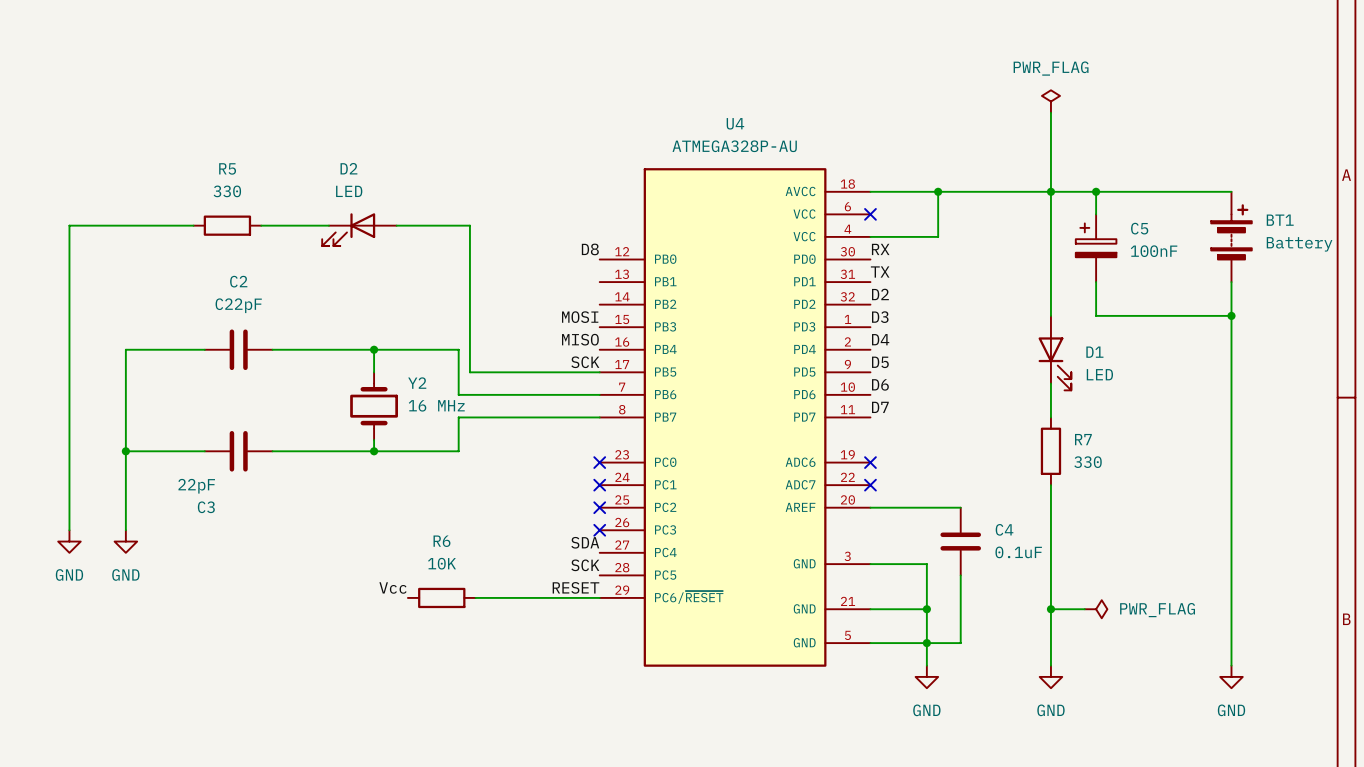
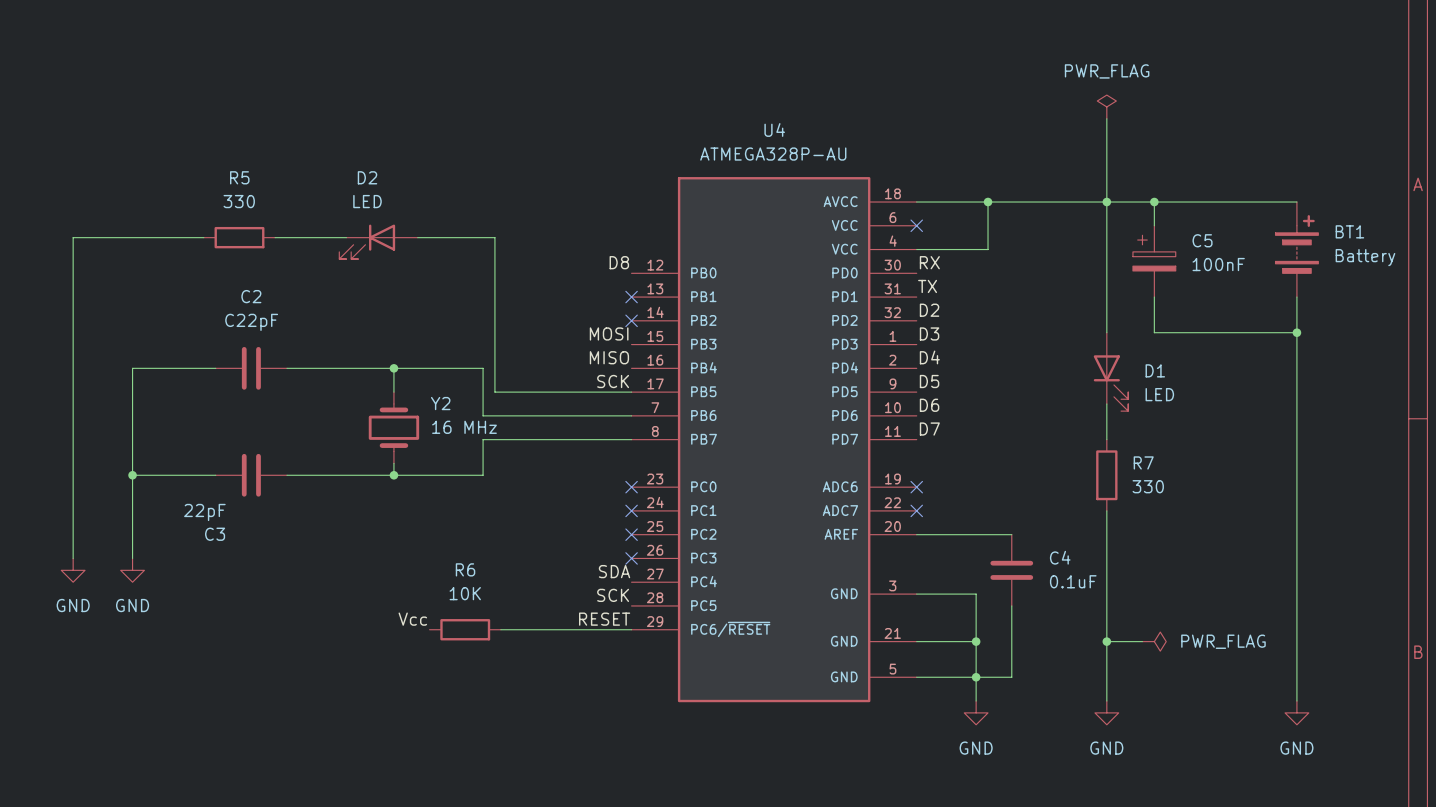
no-connect mark: none -> (631, 297)
no-connect mark: none -> (631, 320)

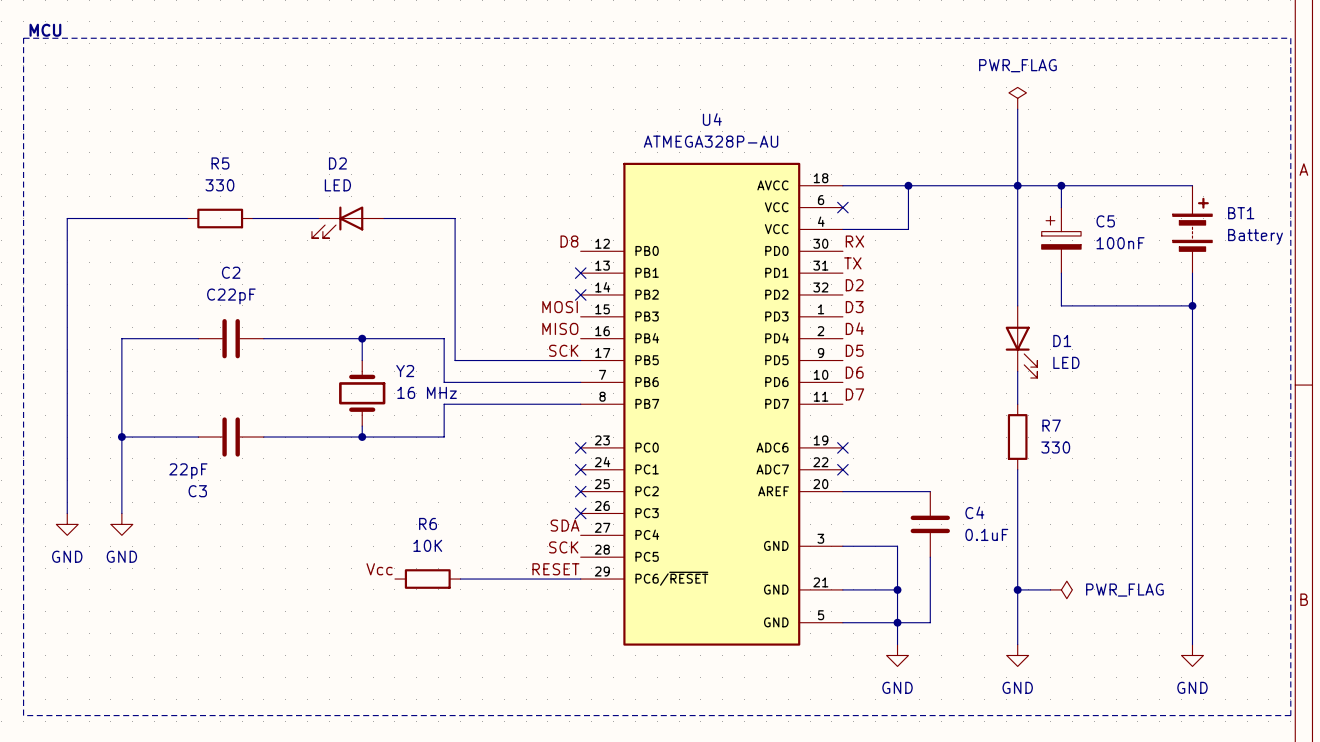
text: none -> MCU (45, 30)
line: none -> (23, 38) (1290, 38) (1290, 715) (23, 715) (23, 38)

